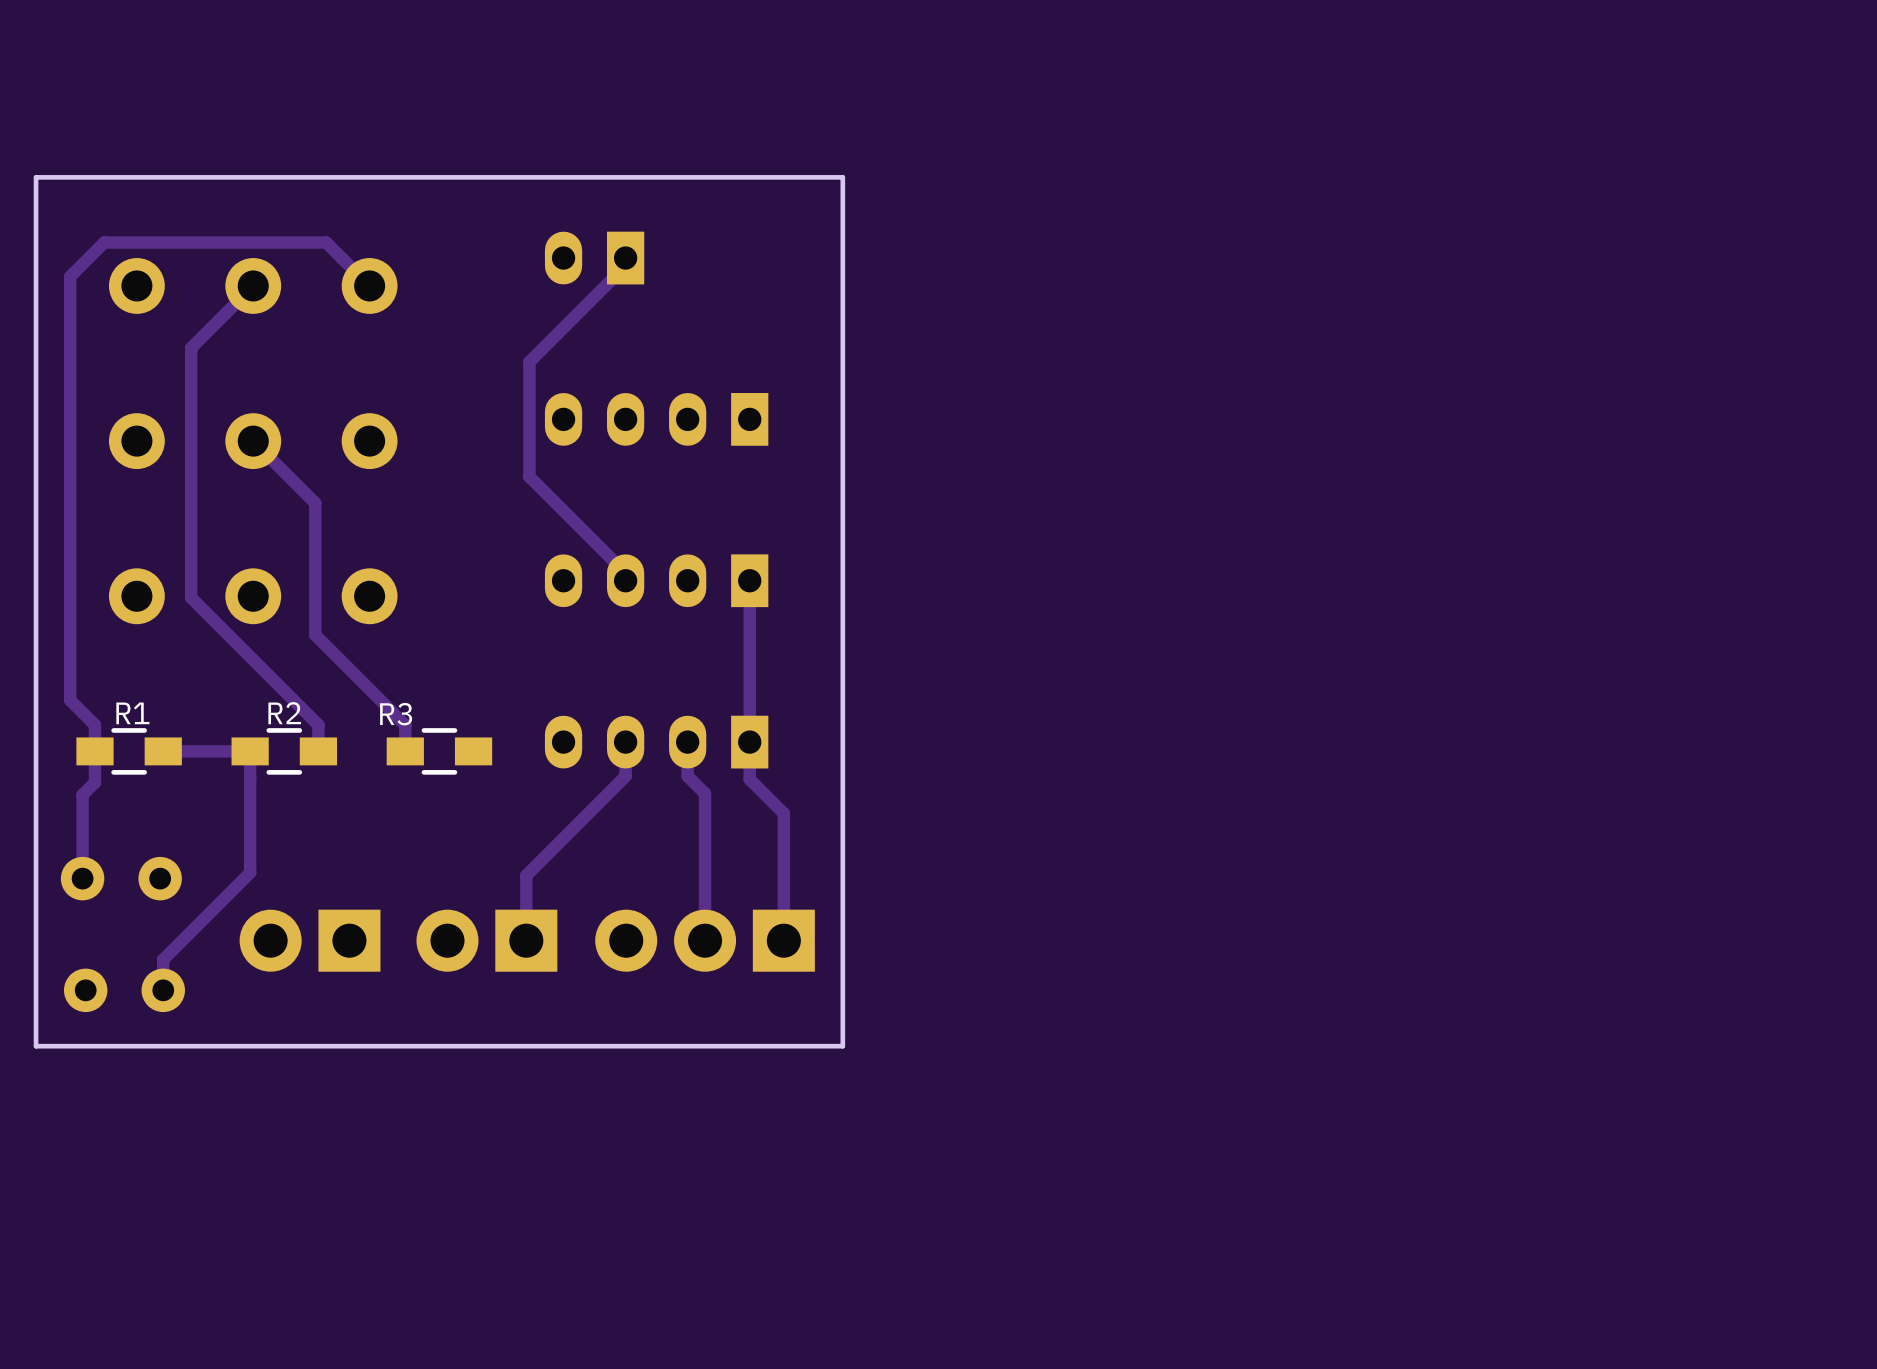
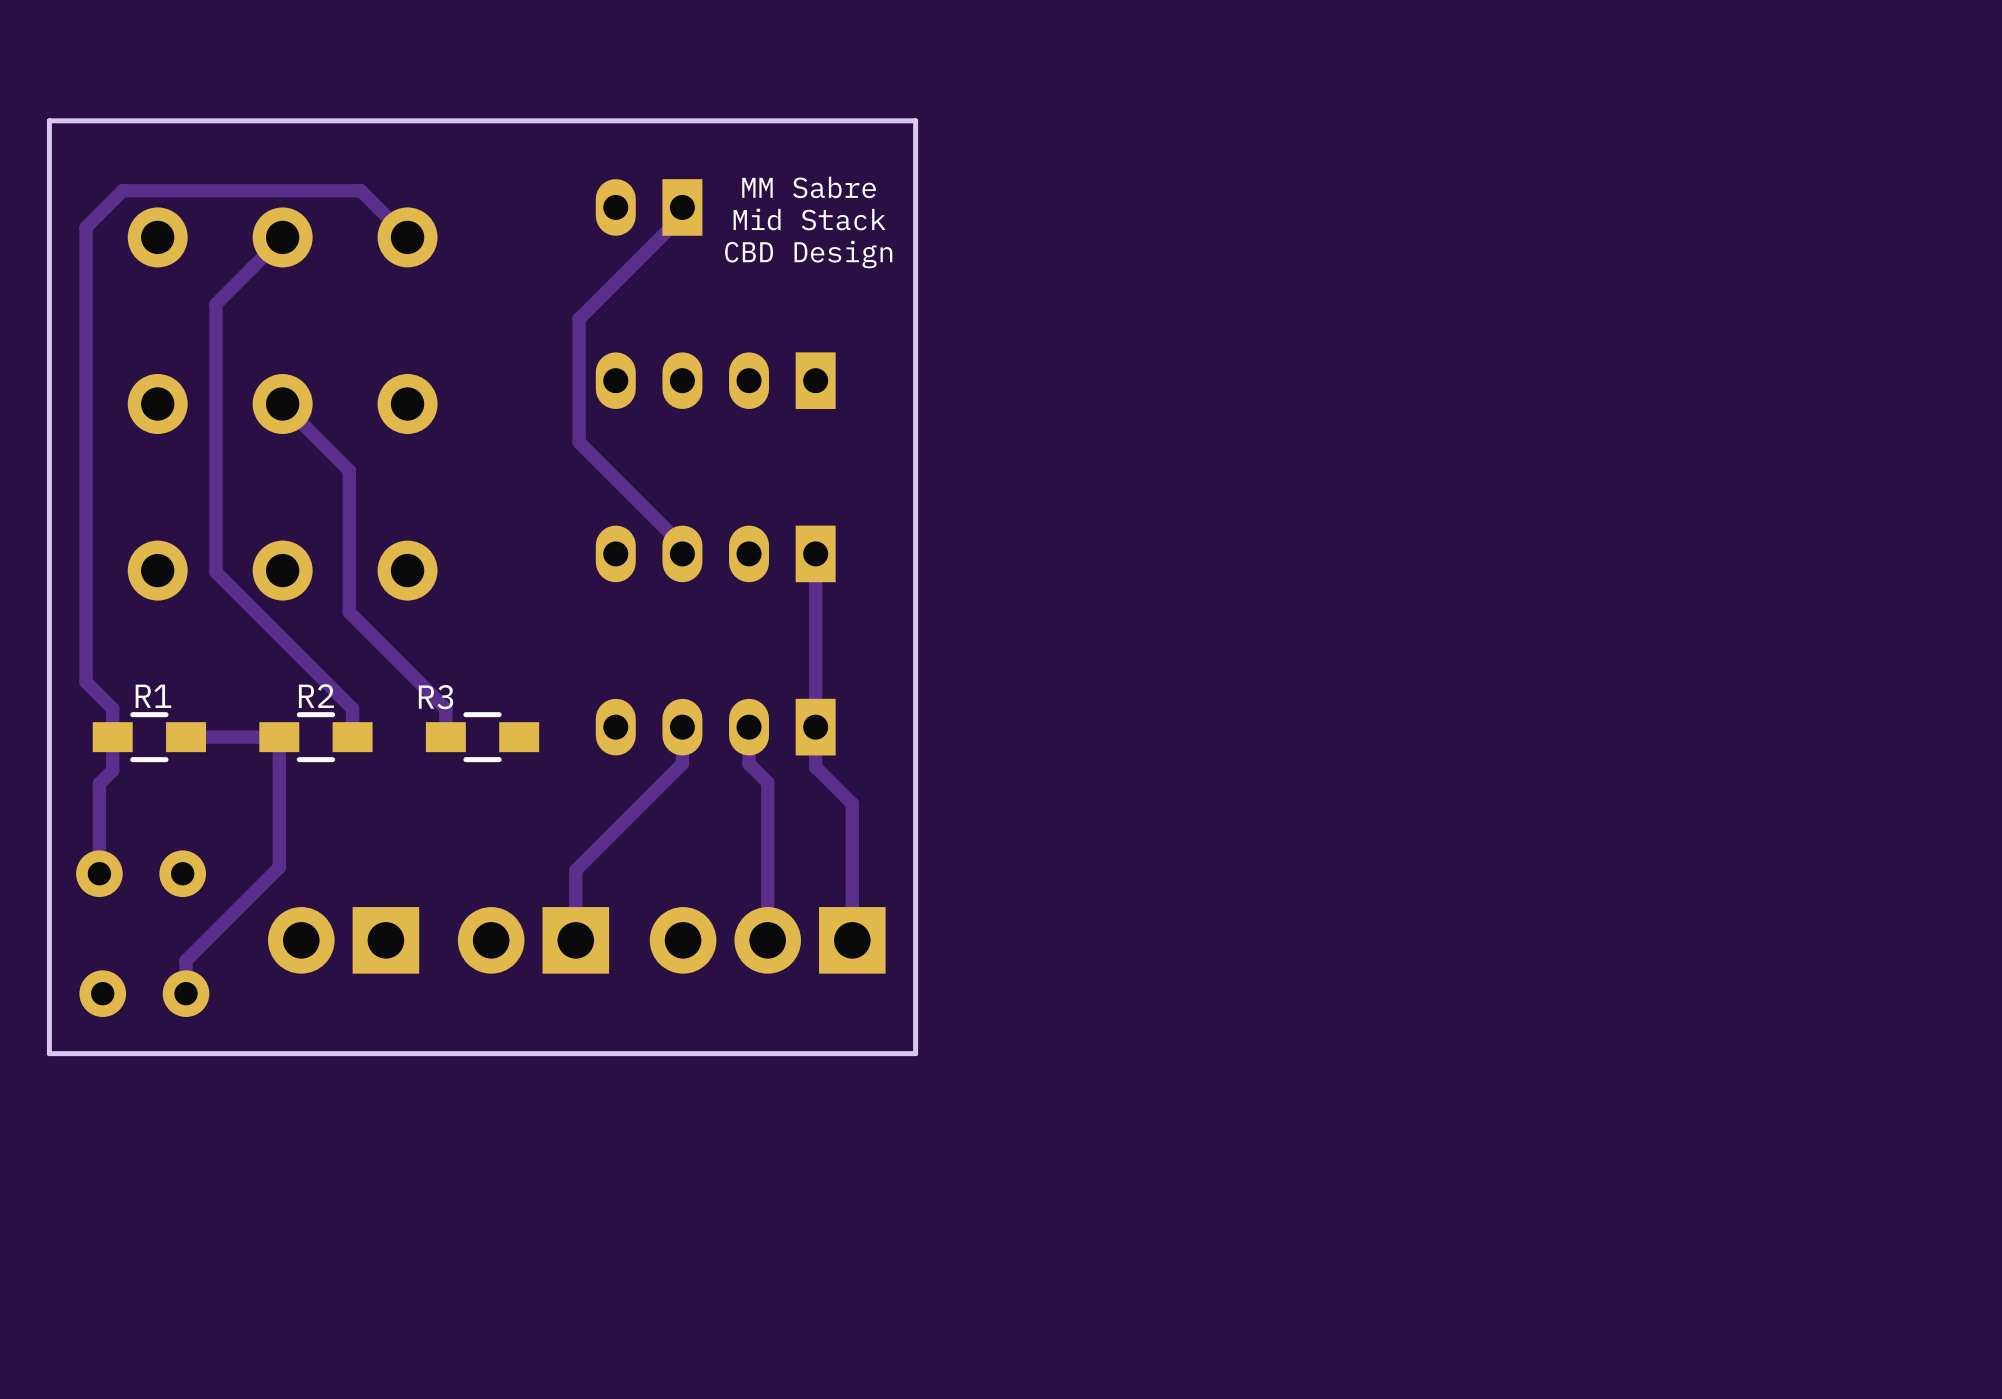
text: none -> MM Sabre (809, 187)
text: none -> Mid Stack (809, 219)
text: none -> CBD Design (808, 254)

